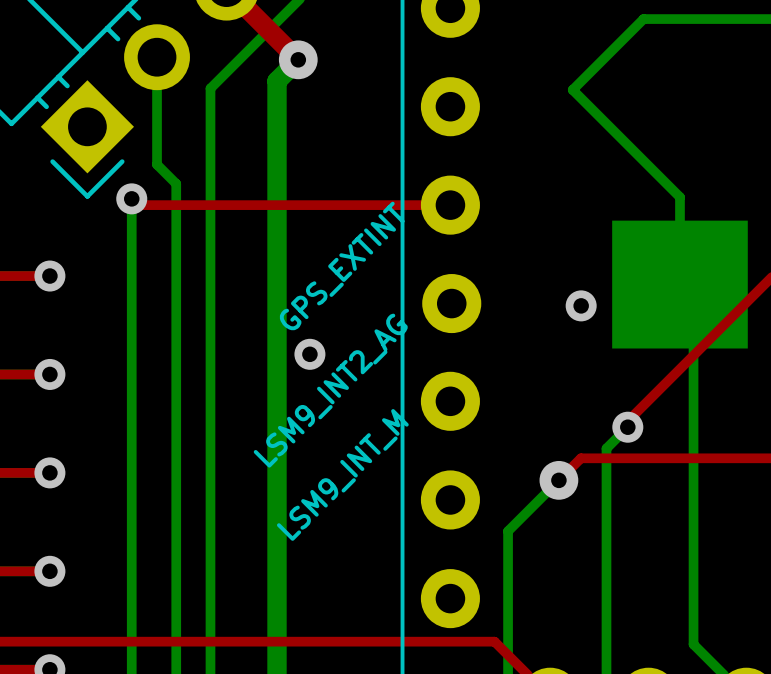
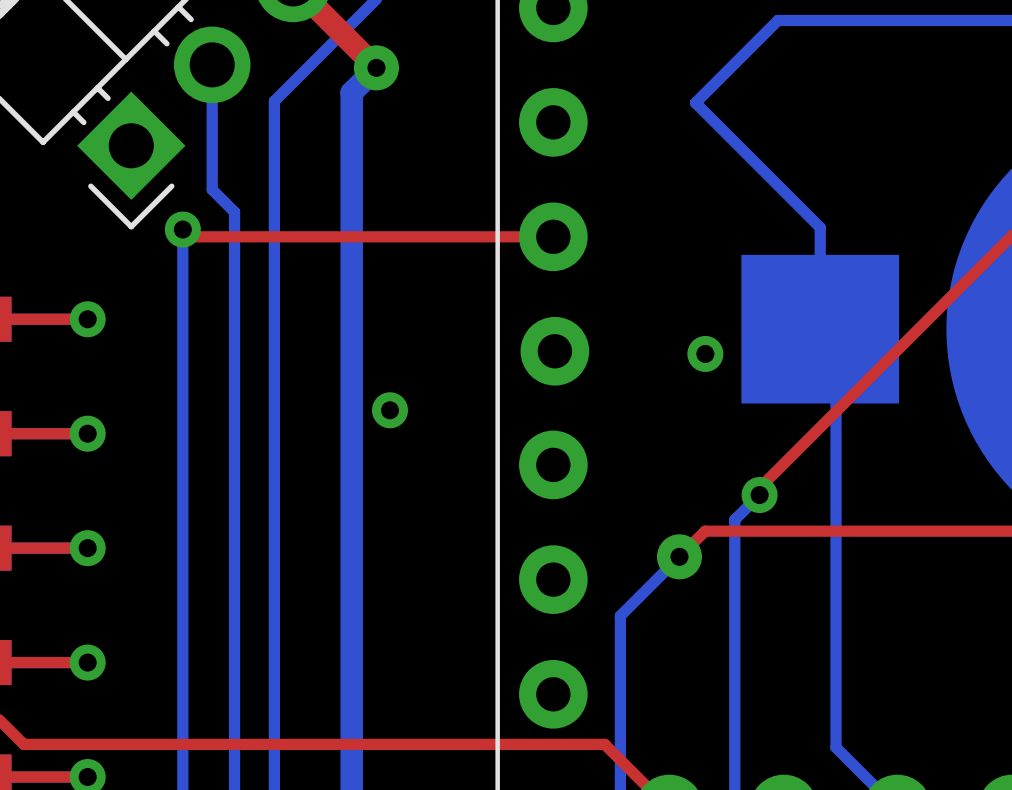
text: GPS_EXTINT (342, 265) -> none
text: LSM9_INT2_AG (330, 390) -> none
text: LSM9_INT_M (342, 474) -> none

